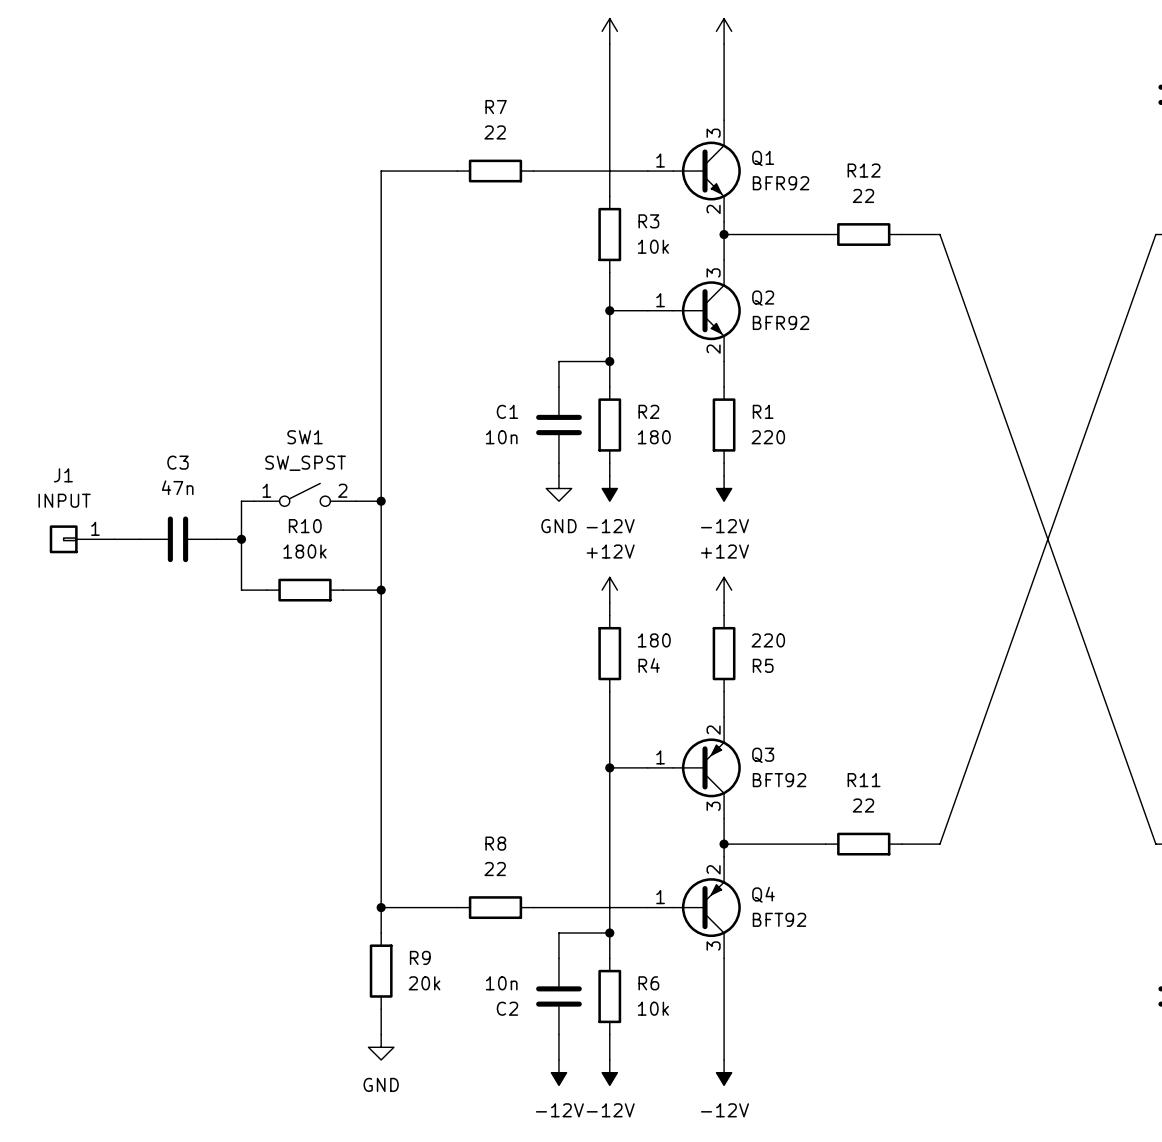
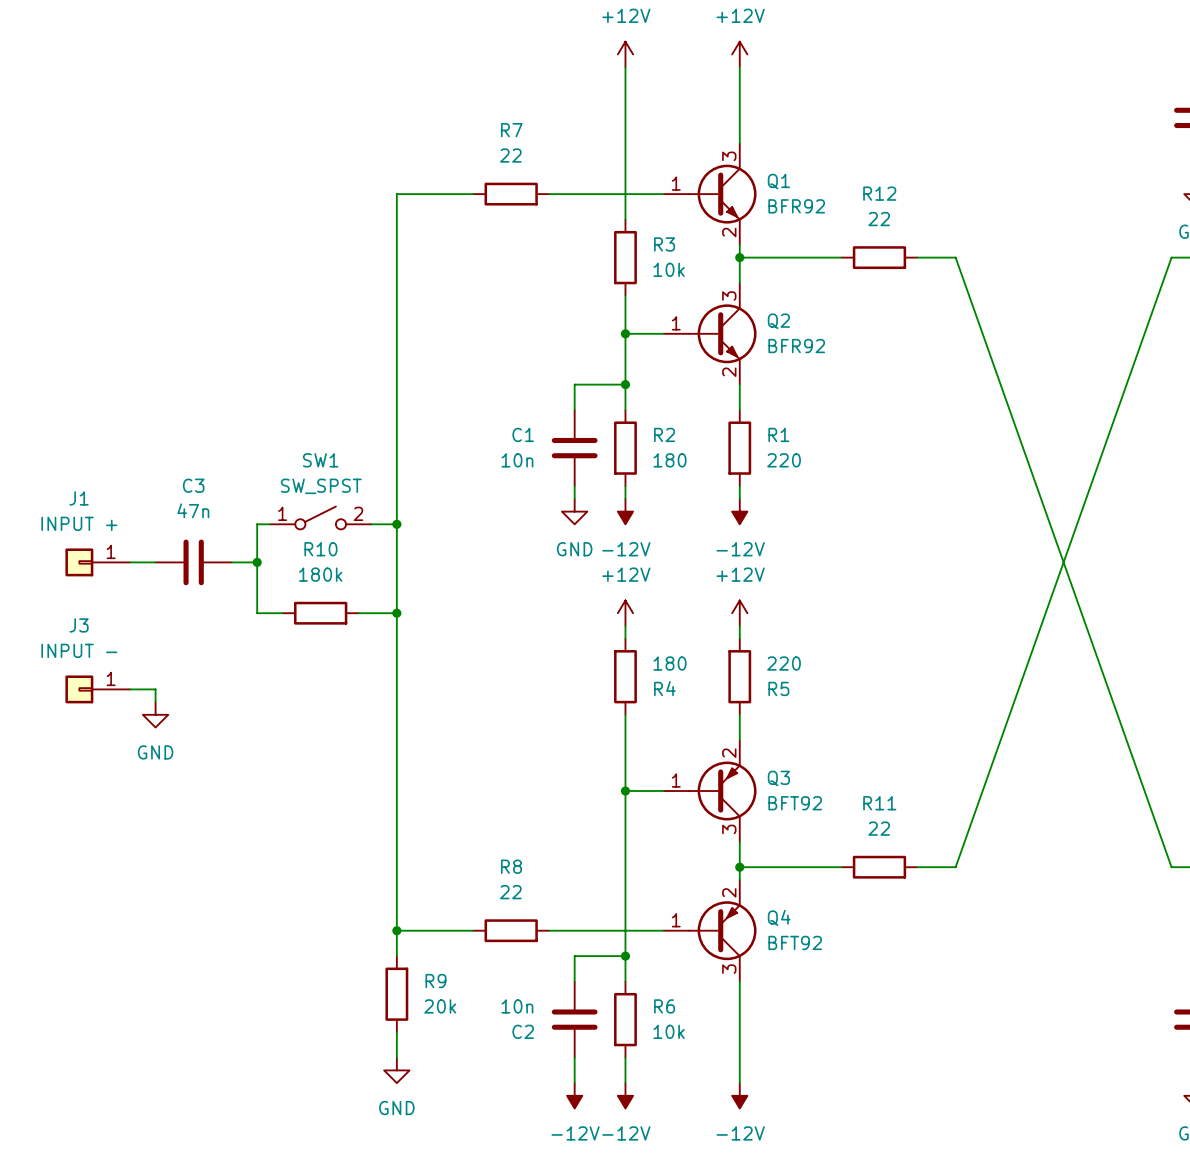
J1 value: INPUT (64, 500) -> INPUT + (79, 523)
J3: none -> INPUT - (97, 689)
wire: none -> (130, 689) (155, 689) (155, 702)
power symbol: none -> GND (155, 714)

